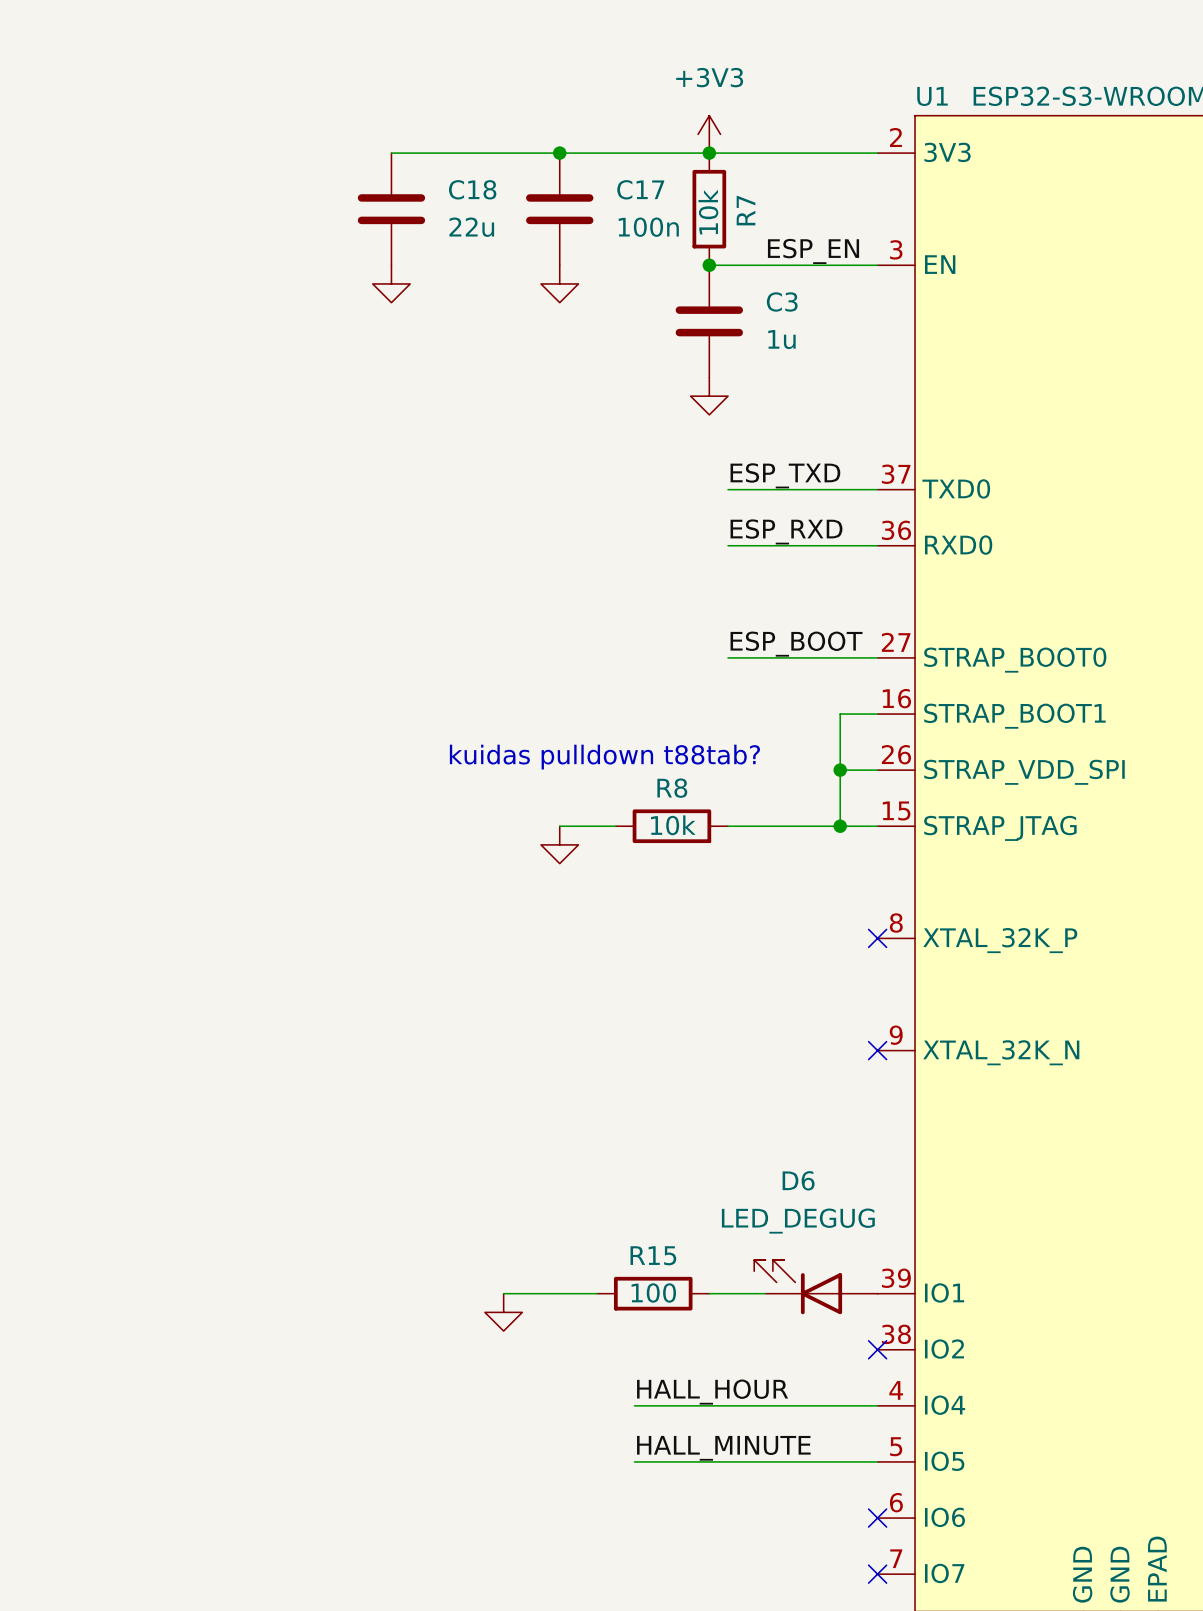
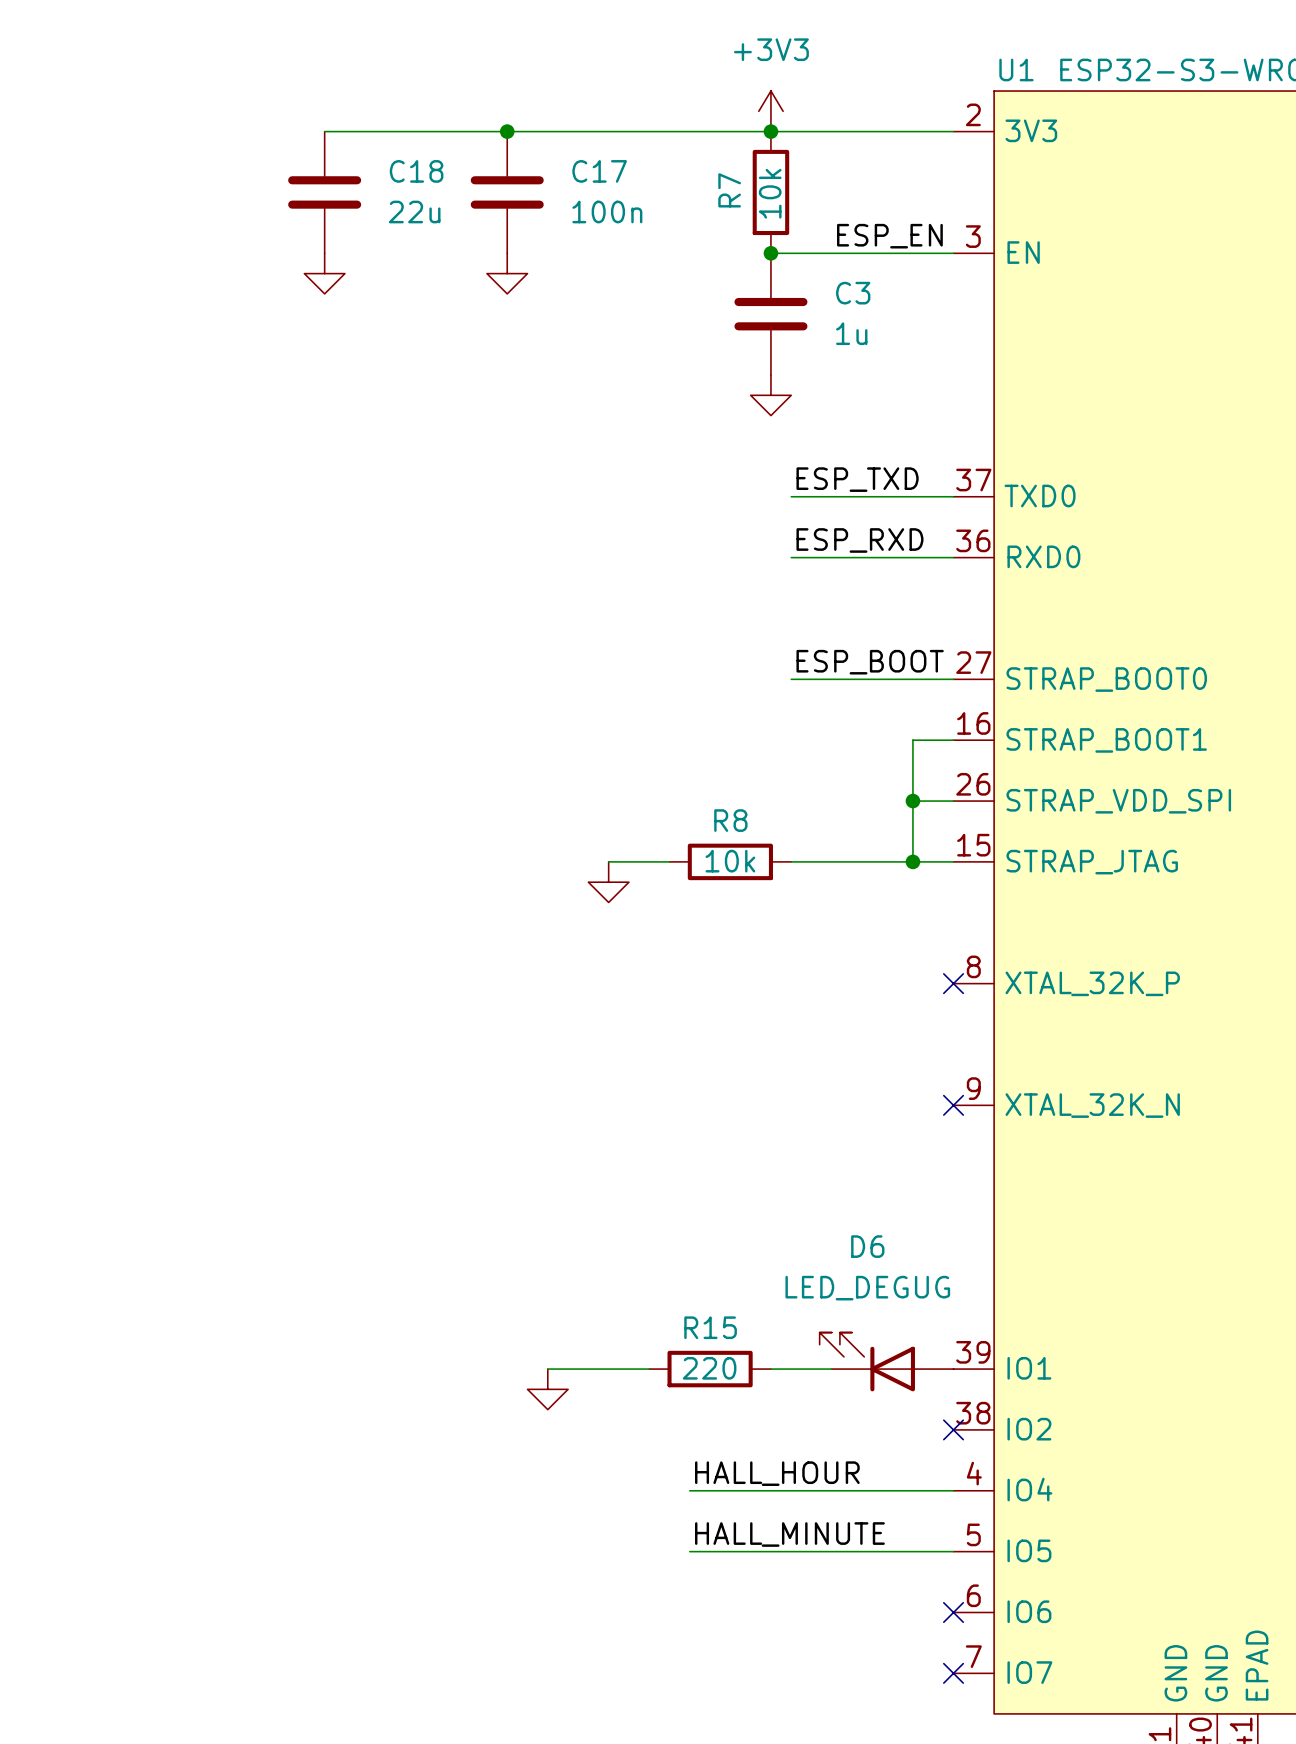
wire: none -> (324, 131) (426, 131)
junction: none -> (507, 131)
junction: (559, 153) -> none
C18 position: (391, 209) -> (324, 192)
C17 position: (559, 209) -> (507, 192)
R7 name position: R7 (746, 210) -> R7 (729, 190)
power symbol: none -> (324, 273)
power symbol: (391, 283) -> none
power symbol: none -> (507, 273)
power symbol: (559, 283) -> none
text: kuidas pulldown t88tab? (604, 757) -> none
R15 value: 100 (653, 1292) -> 220 (709, 1368)

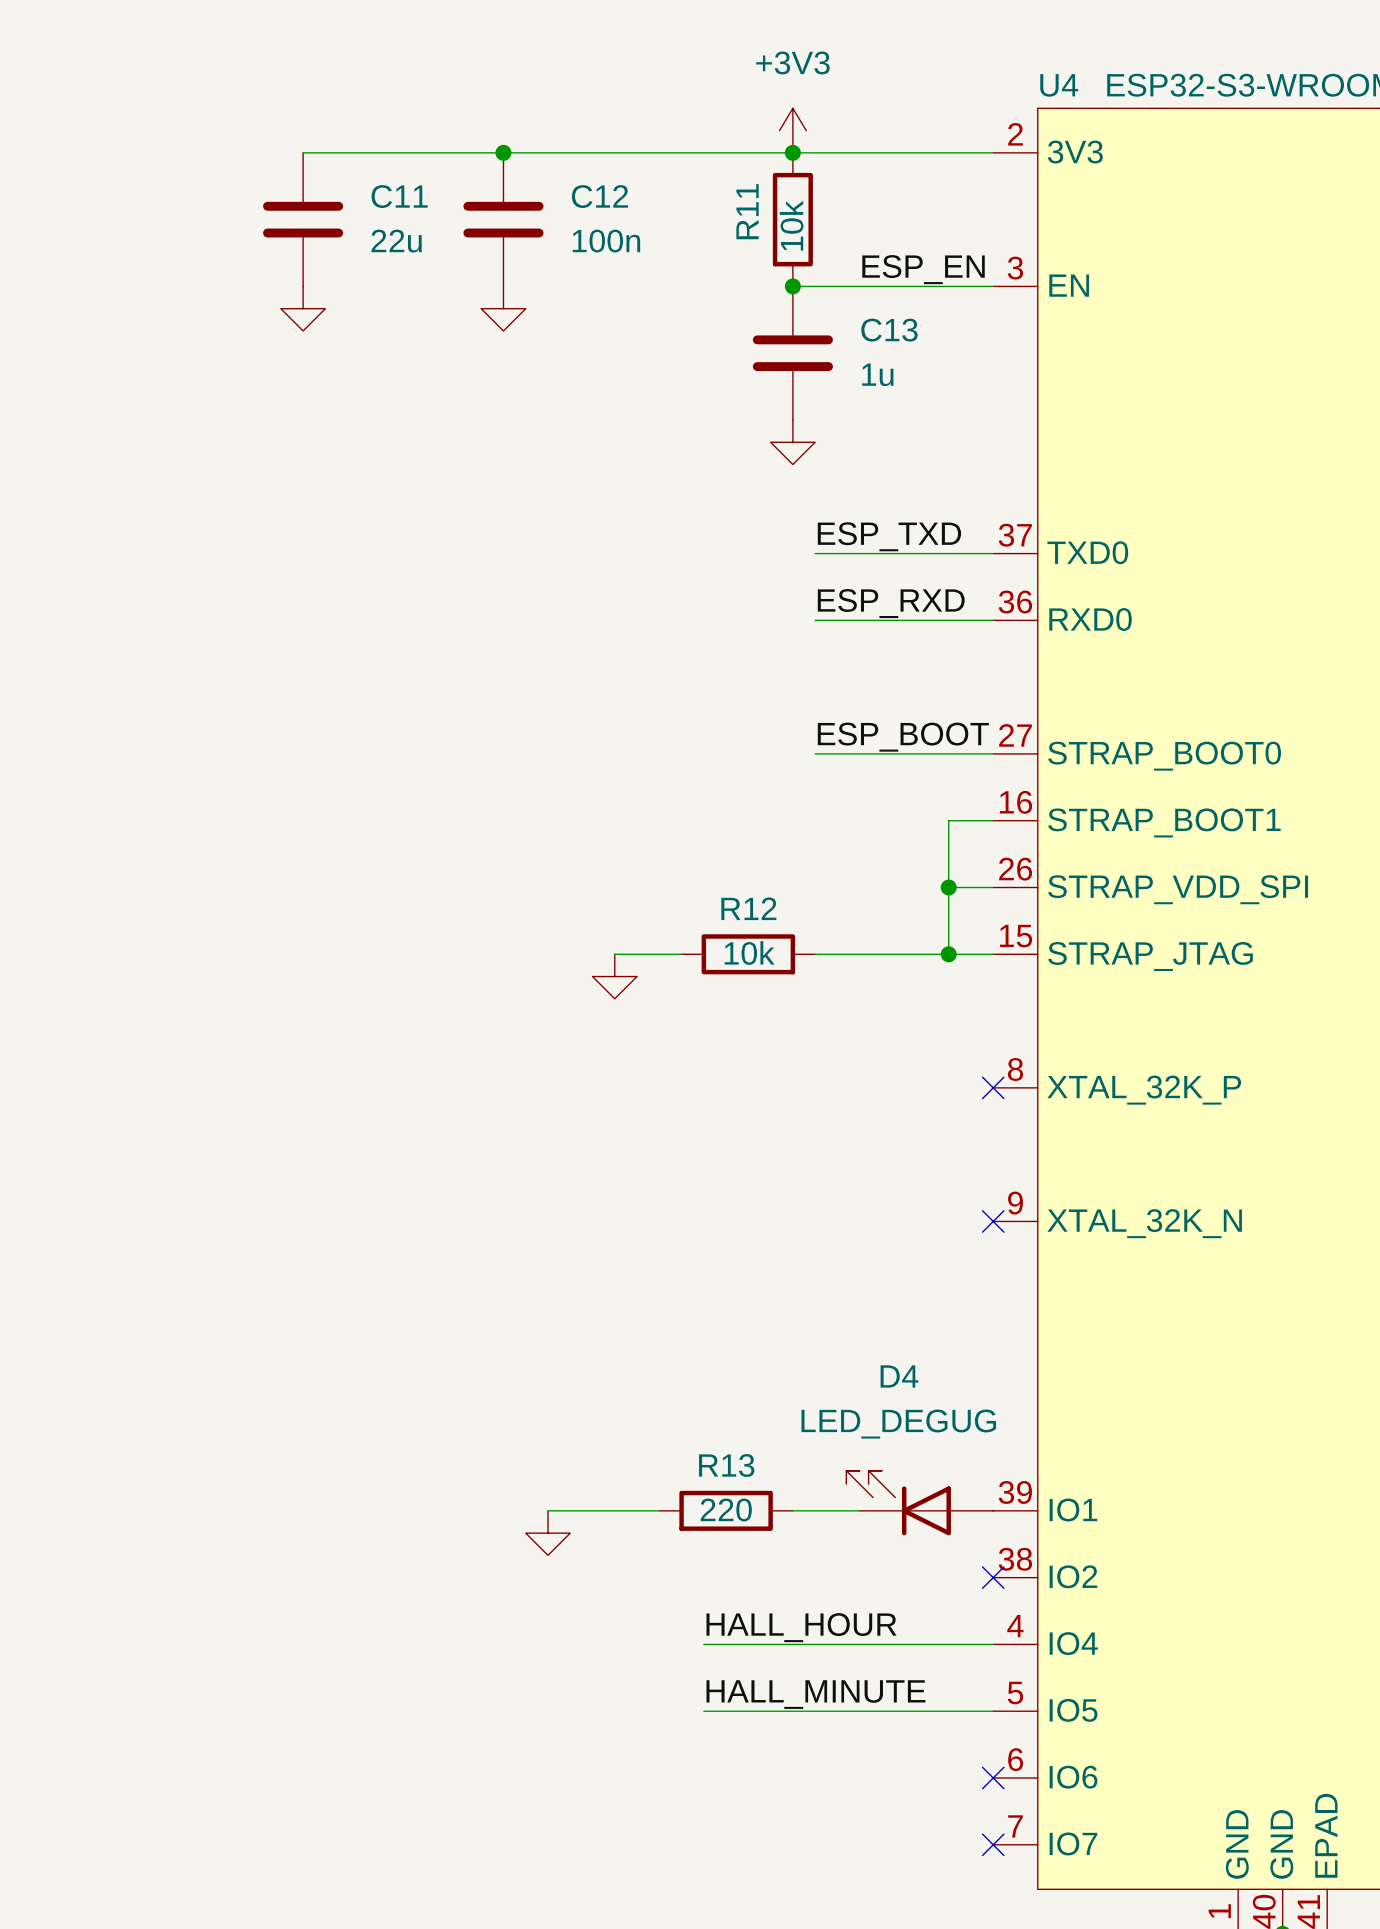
U1 name: U1 (1016, 69) -> U4 (1059, 85)
C18 name: C18 (416, 171) -> C11 (399, 196)
C17 name: C17 (599, 171) -> C12 (599, 196)
R7 name: R7 (729, 190) -> R11 (747, 211)
C3 name: C3 (853, 293) -> C13 (889, 330)
R8 name: R8 (730, 820) -> R12 (748, 908)
D6 name: D6 (867, 1246) -> D4 (899, 1376)
R15 name: R15 (710, 1327) -> R13 (726, 1465)

